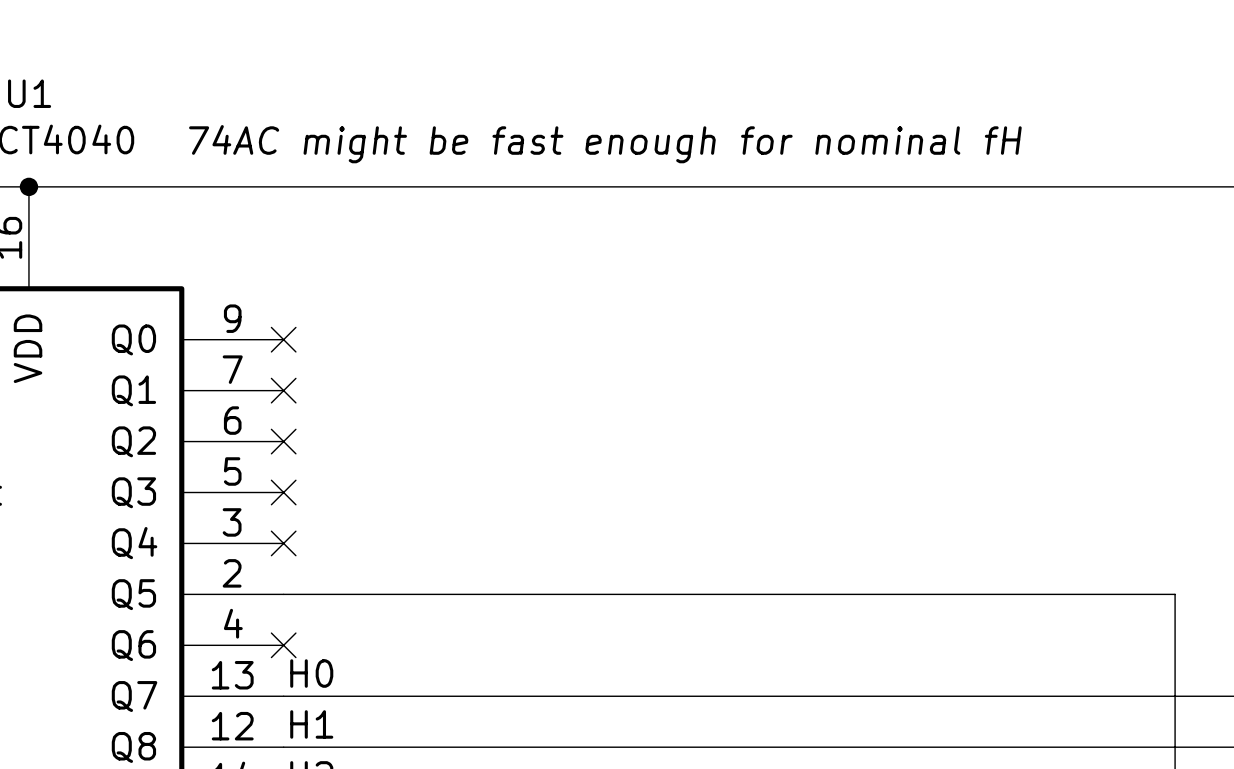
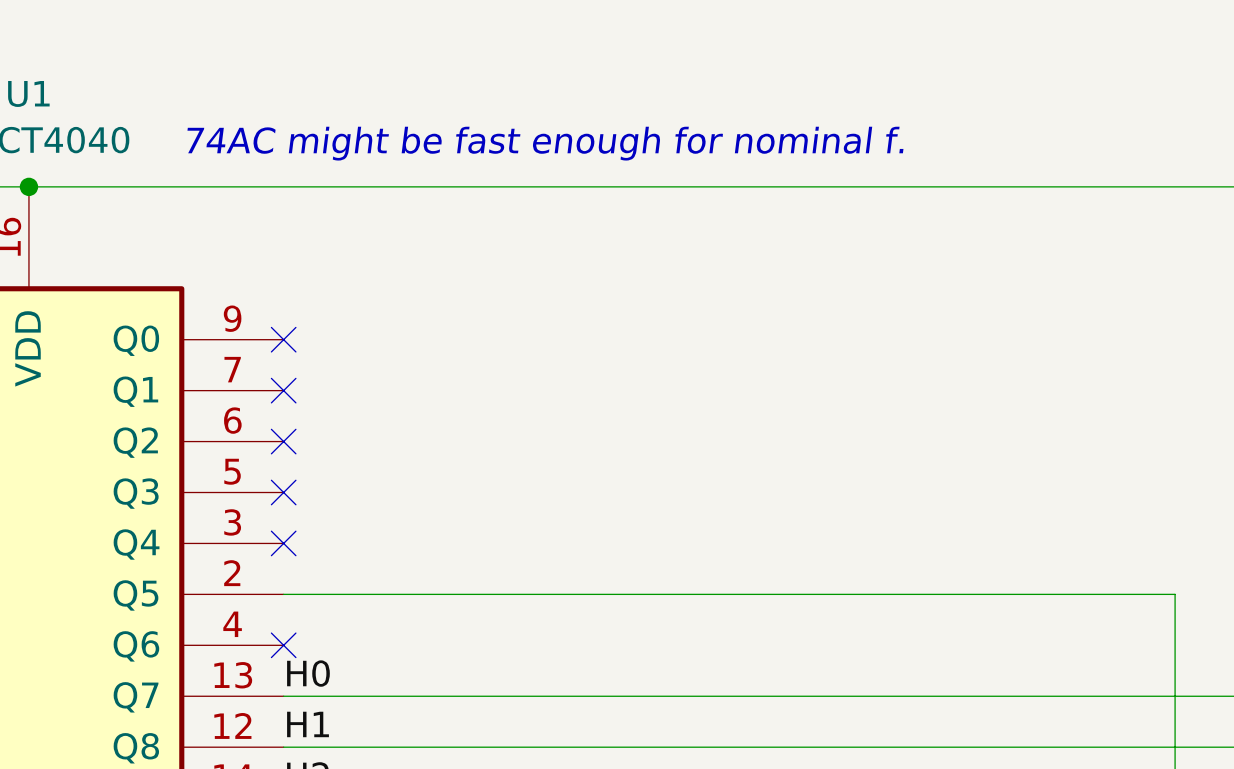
text: 74AC might be fast enough for nominal fH (605, 144) -> 74AC might be fast enough for nominal f. (545, 143)

